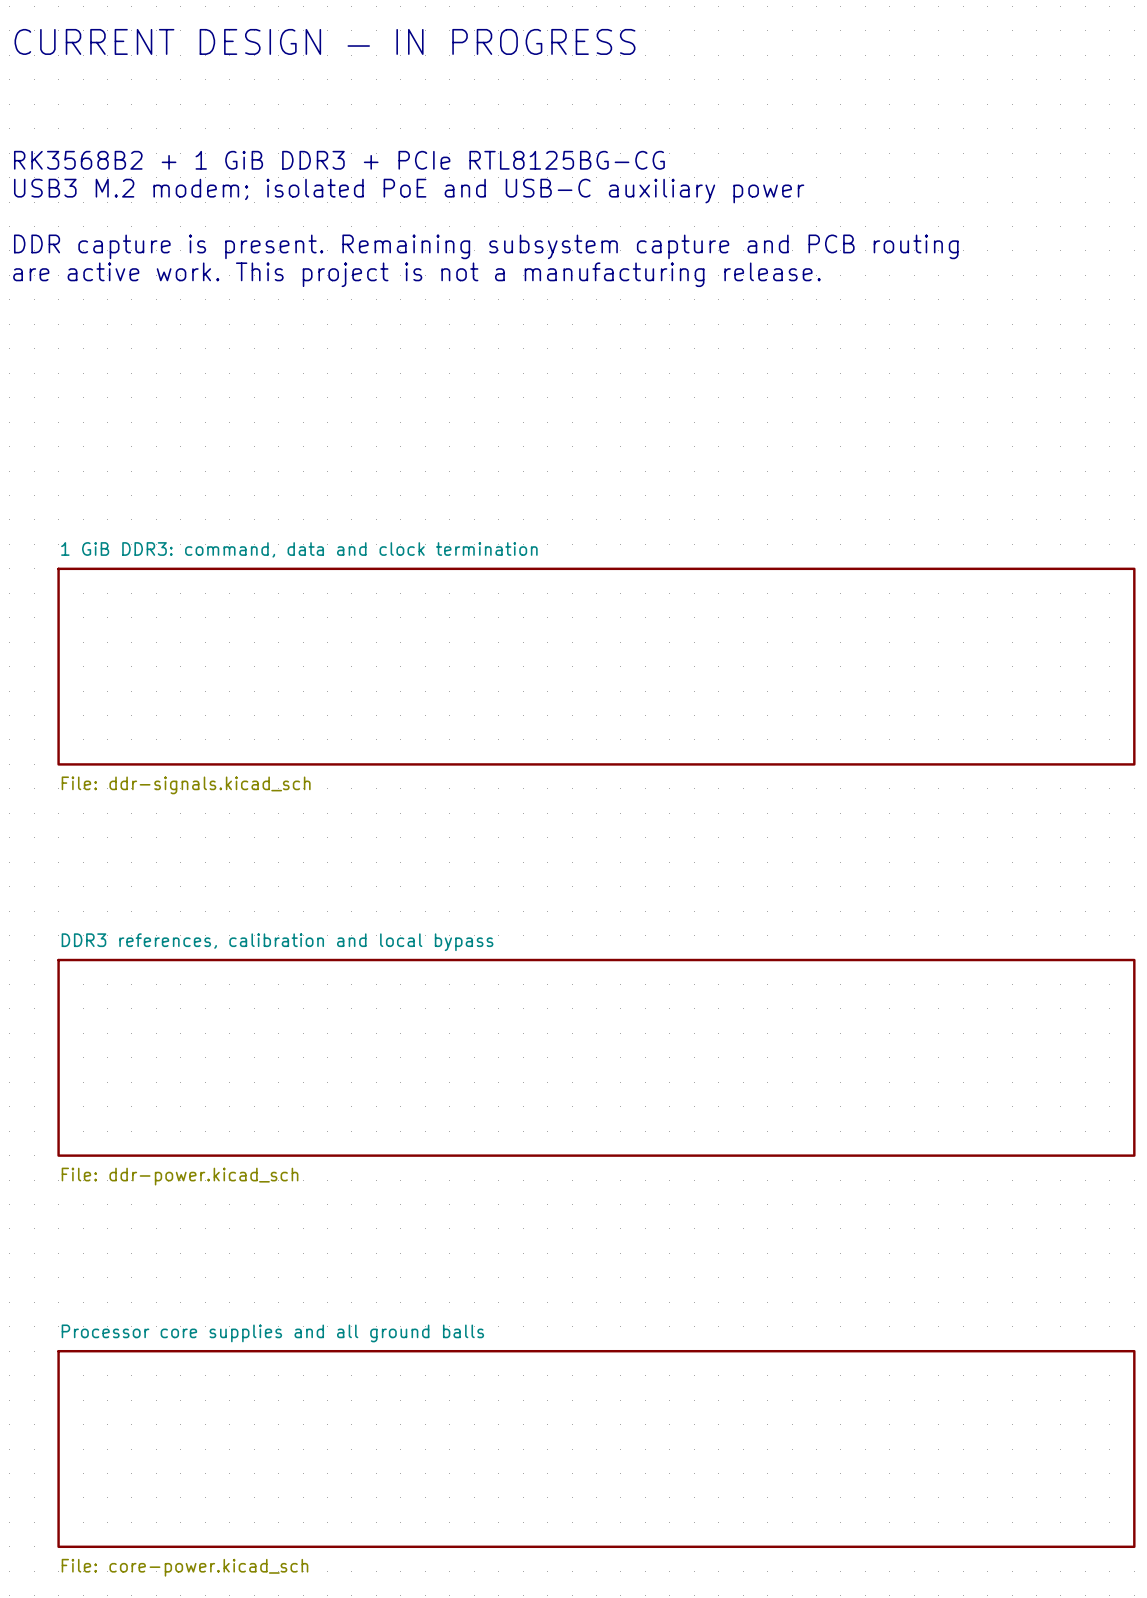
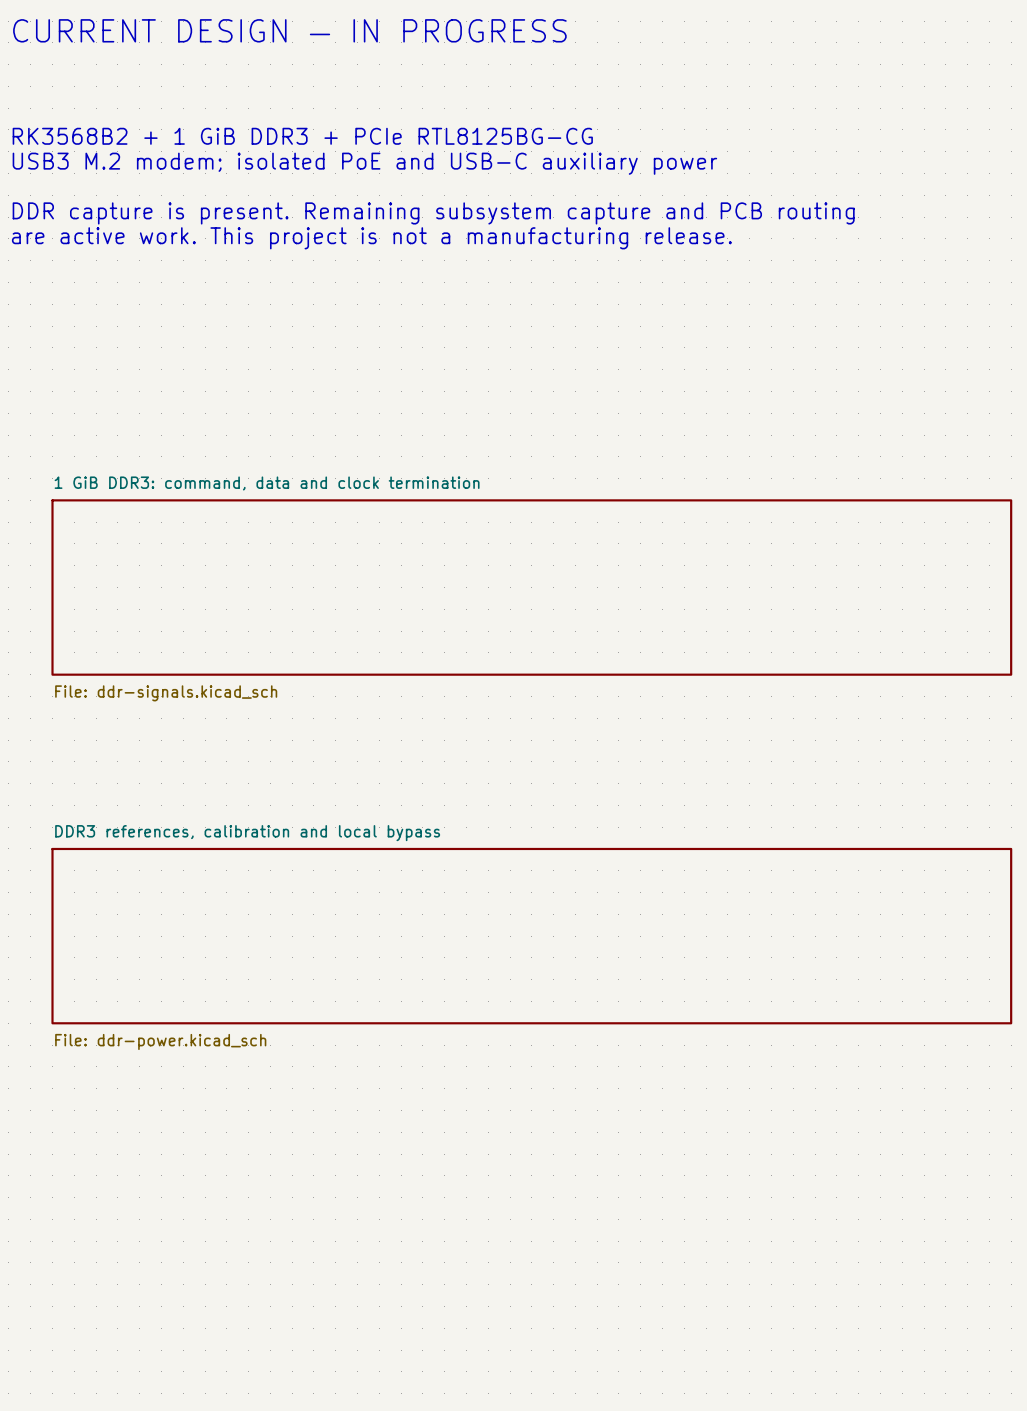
sheet Processor core supplies and all ground balls: File: core-power.kicad_sch (596, 1449) -> none

